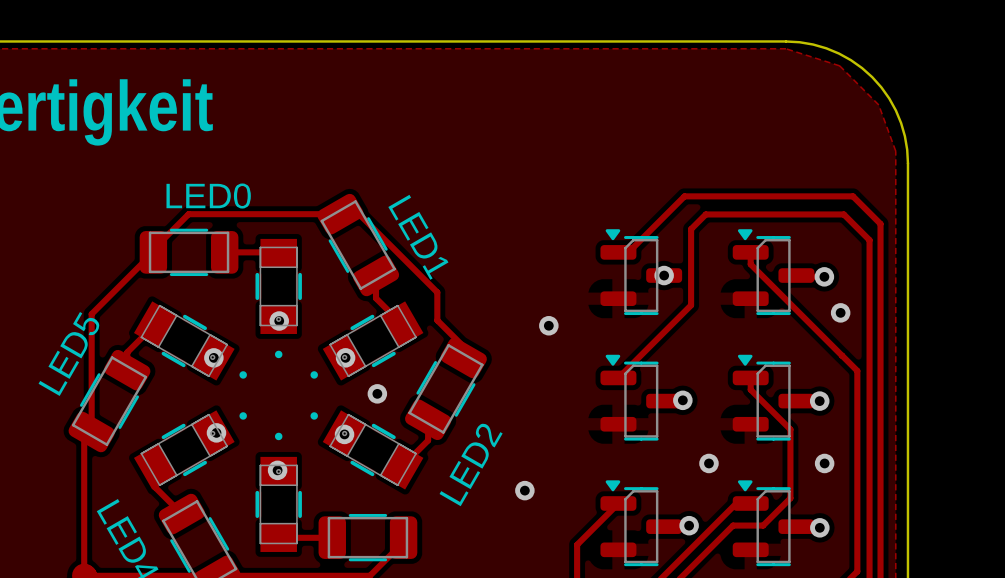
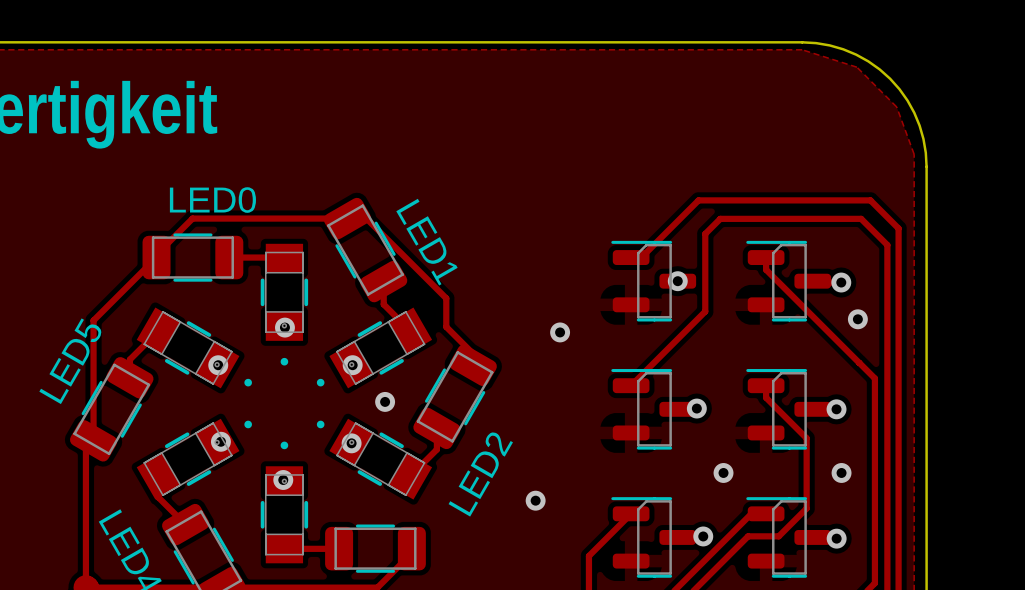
part footprint: [600, 229, 683, 316] -> [611, 240, 697, 322]
part footprint: [732, 229, 815, 316] -> [746, 240, 832, 322]
part footprint: [600, 354, 683, 441] -> [611, 369, 697, 450]
part footprint: [732, 354, 815, 441] -> [746, 369, 832, 450]
part footprint: [600, 480, 683, 567] -> [611, 497, 697, 578]
part footprint: [732, 480, 815, 567] -> [746, 497, 832, 578]

